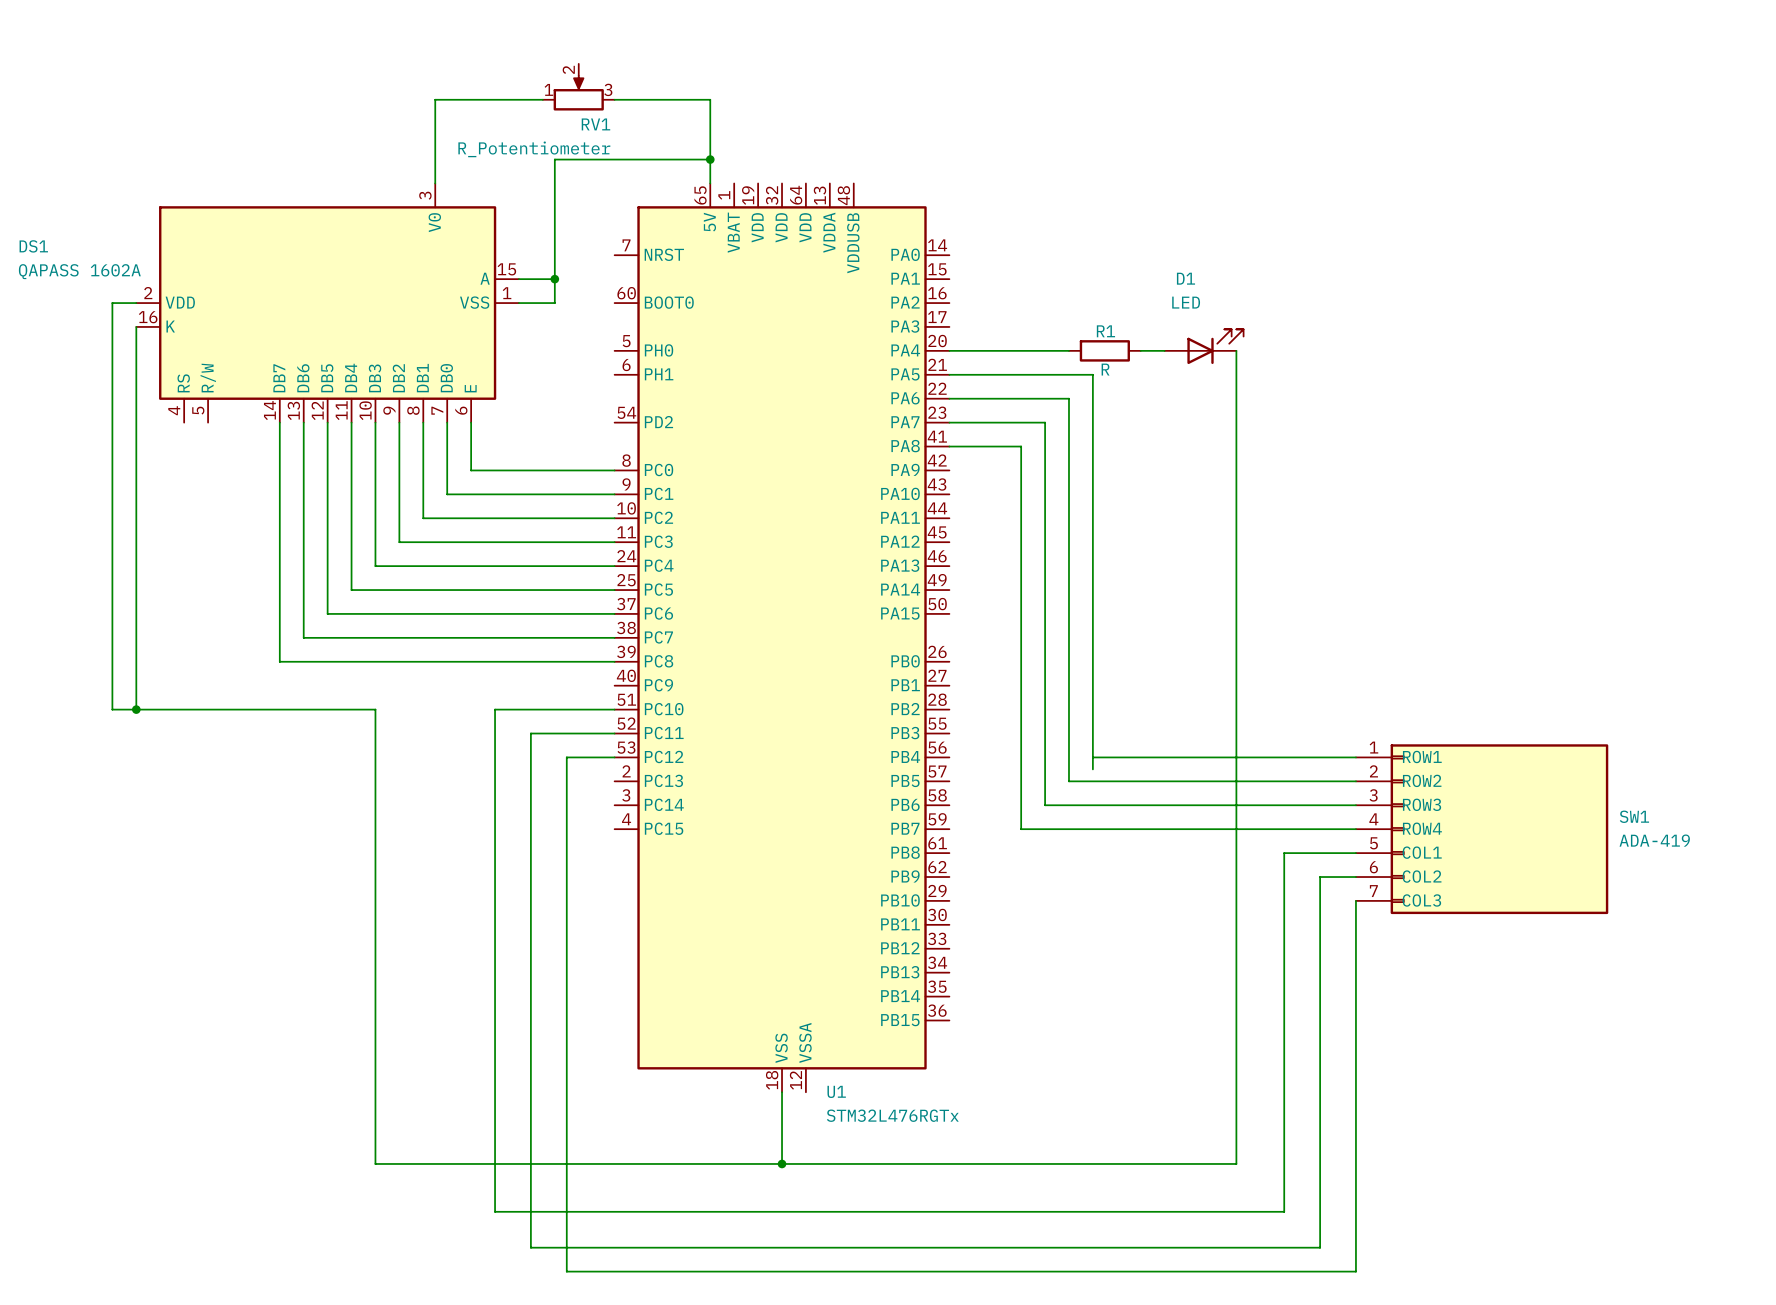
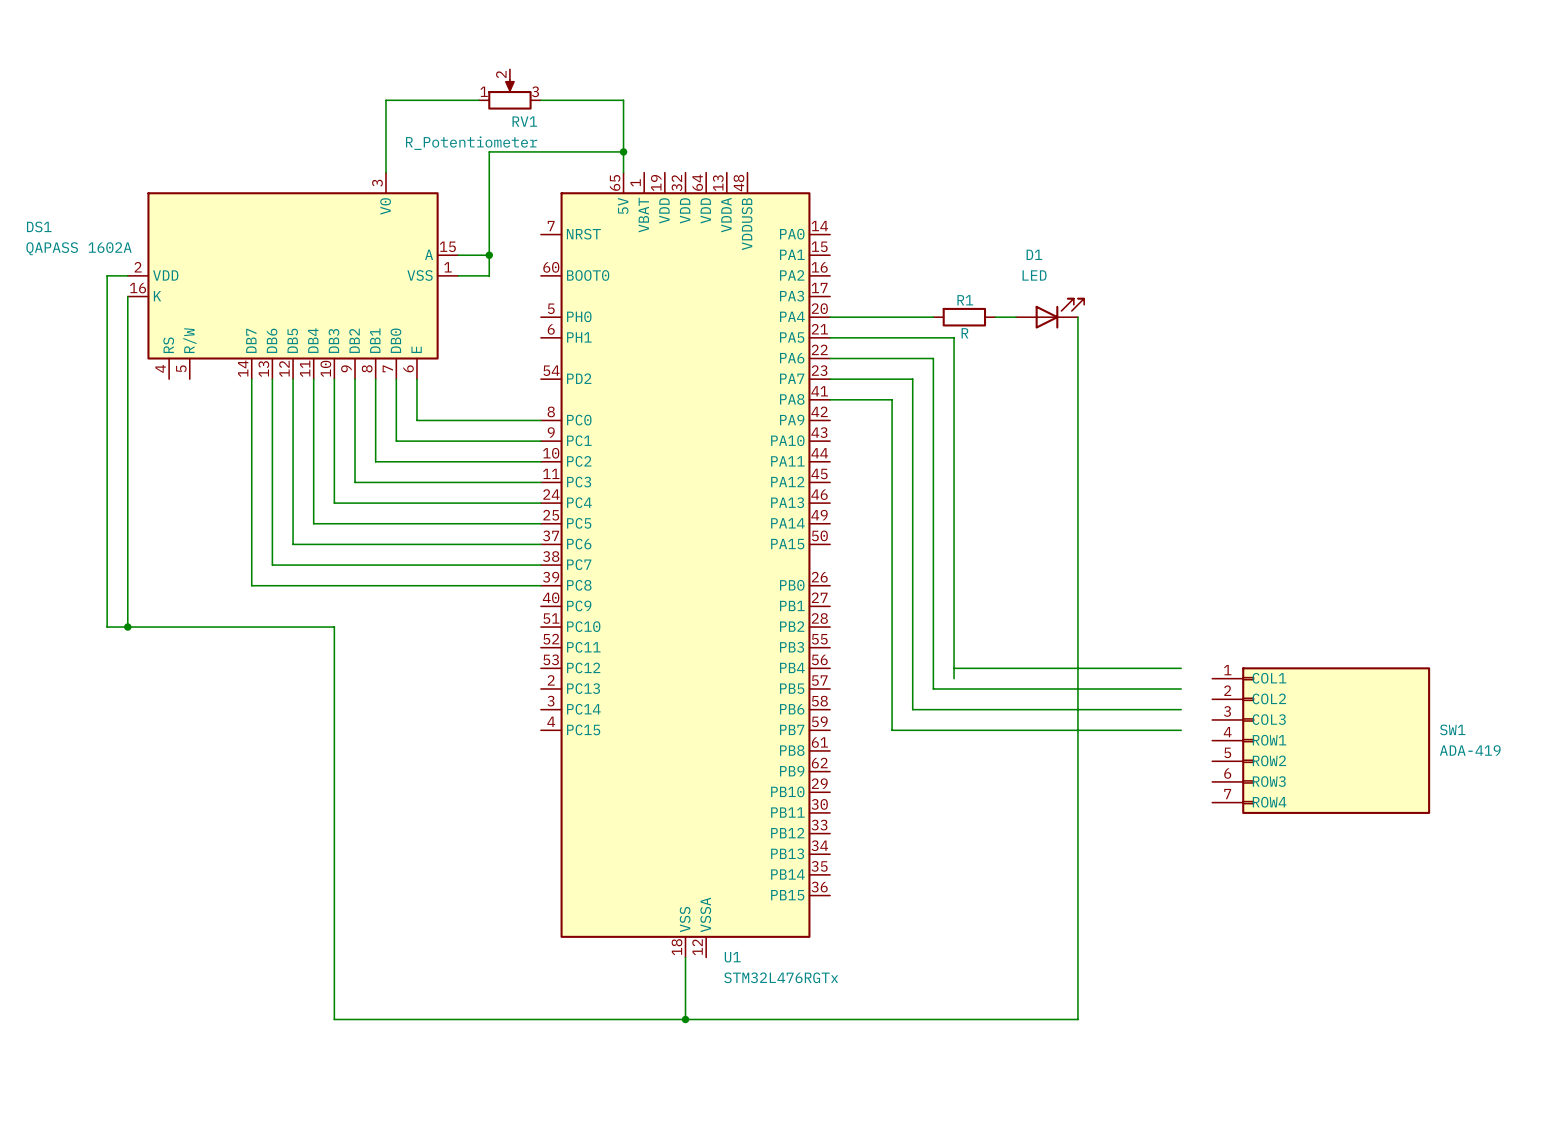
wire: (614, 709) (495, 709) (495, 1211) (1284, 1211) (1284, 853) (1355, 853) -> none
wire: (614, 733) (530, 733) (530, 1247) (1320, 1247) (1320, 877) (1355, 877) -> none
SW1 pin name: ROW1 (1422, 756) -> COL1 (1269, 678)
wire: (614, 757) (566, 757) (566, 1271) (1355, 1271) (1355, 900) -> none
SW1 pin name: ROW2 (1422, 780) -> COL2 (1269, 698)
SW1 pin name: ROW3 (1422, 804) -> COL3 (1269, 719)
SW1 pin name: ROW4 (1422, 828) -> ROW1 (1269, 740)
SW1 position: (1482, 829) -> (1321, 740)
SW1 pin name: COL1 (1422, 852) -> ROW2 (1269, 760)
SW1 pin name: COL2 (1422, 876) -> ROW3 (1269, 781)
SW1 pin name: COL3 (1421, 900) -> ROW4 (1269, 802)

